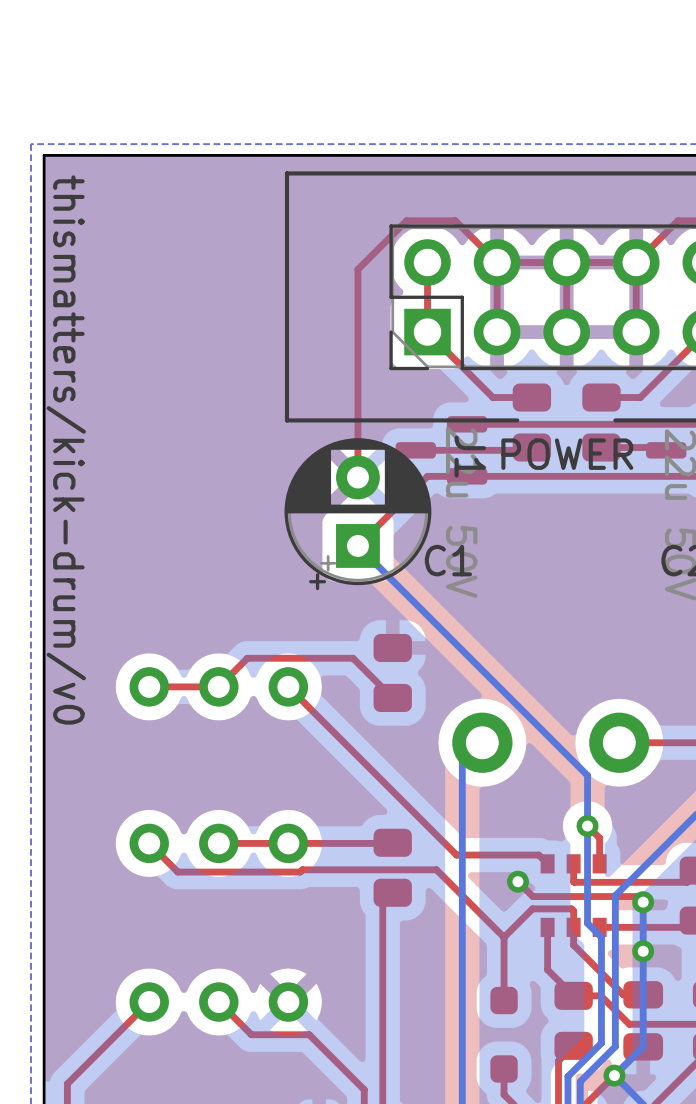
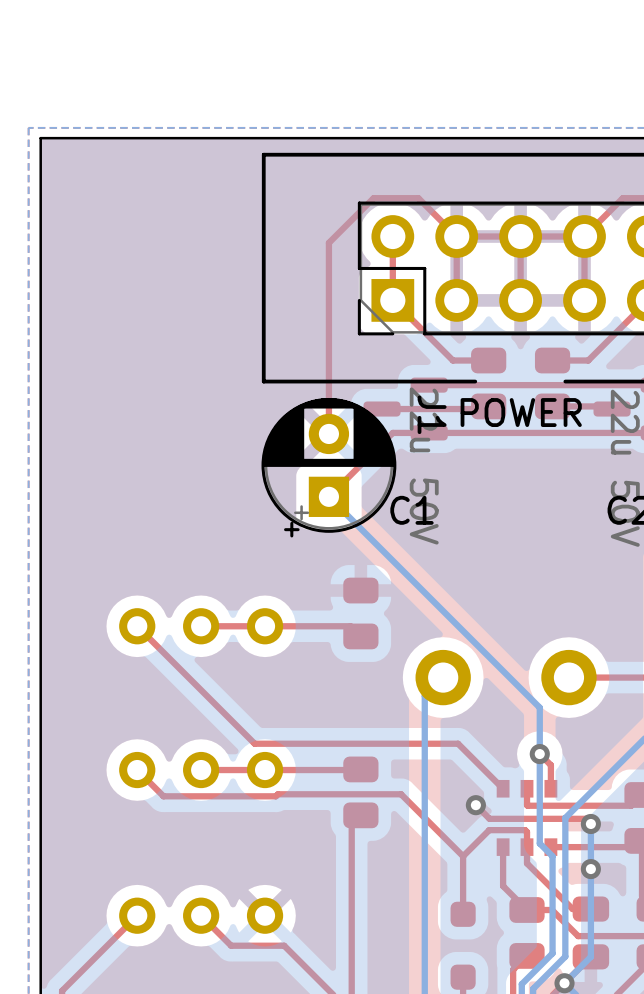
text: thismatters/kick-drum/v0 (66, 449) -> none
top track: (288, 686) (456, 855) (538, 855) -> (137, 626) (254, 743) (458, 743) (495, 780)
top track: (381, 686) (353, 658) (247, 658) (218, 686) (149, 686) -> (350, 626) (201, 626)

